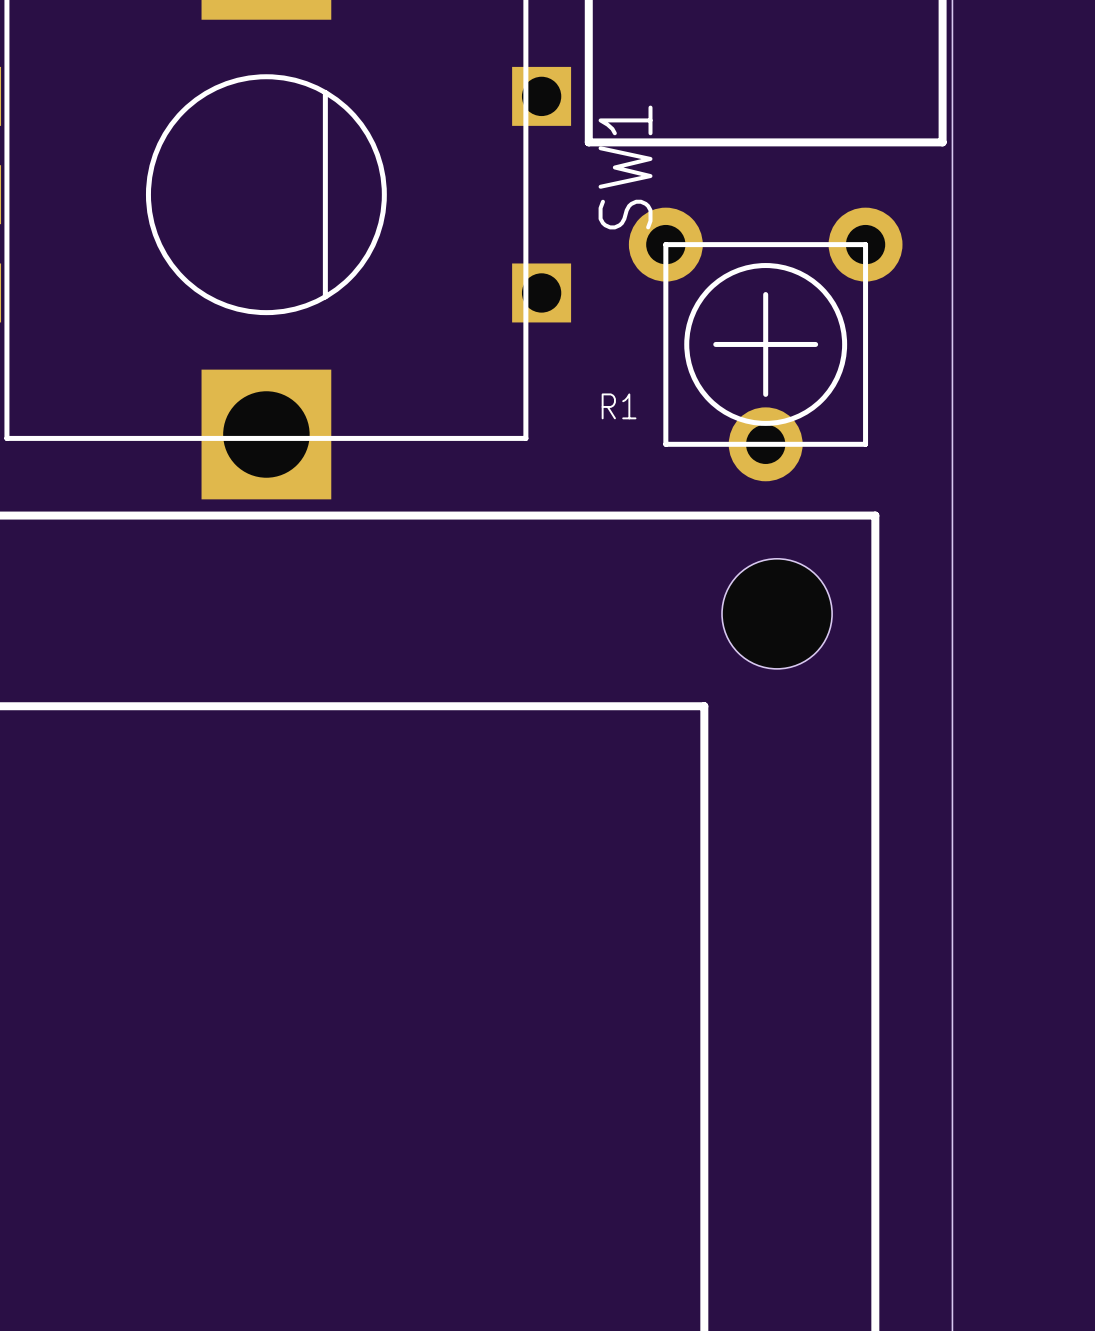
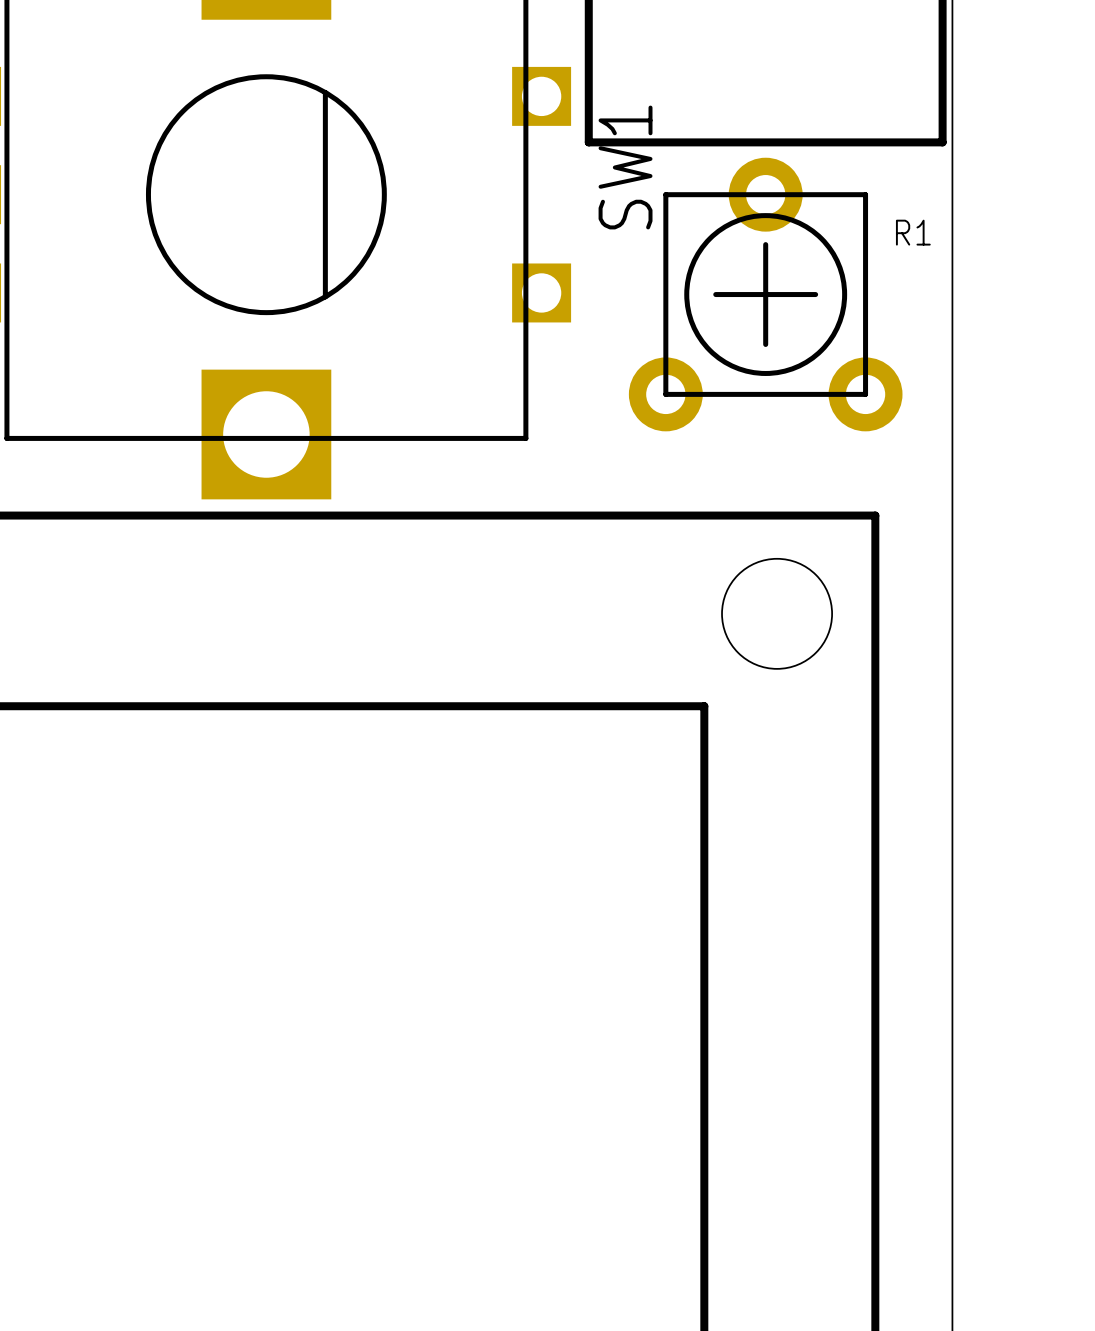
R1 rotation: 0° (765, 344) -> 180° (765, 294)

